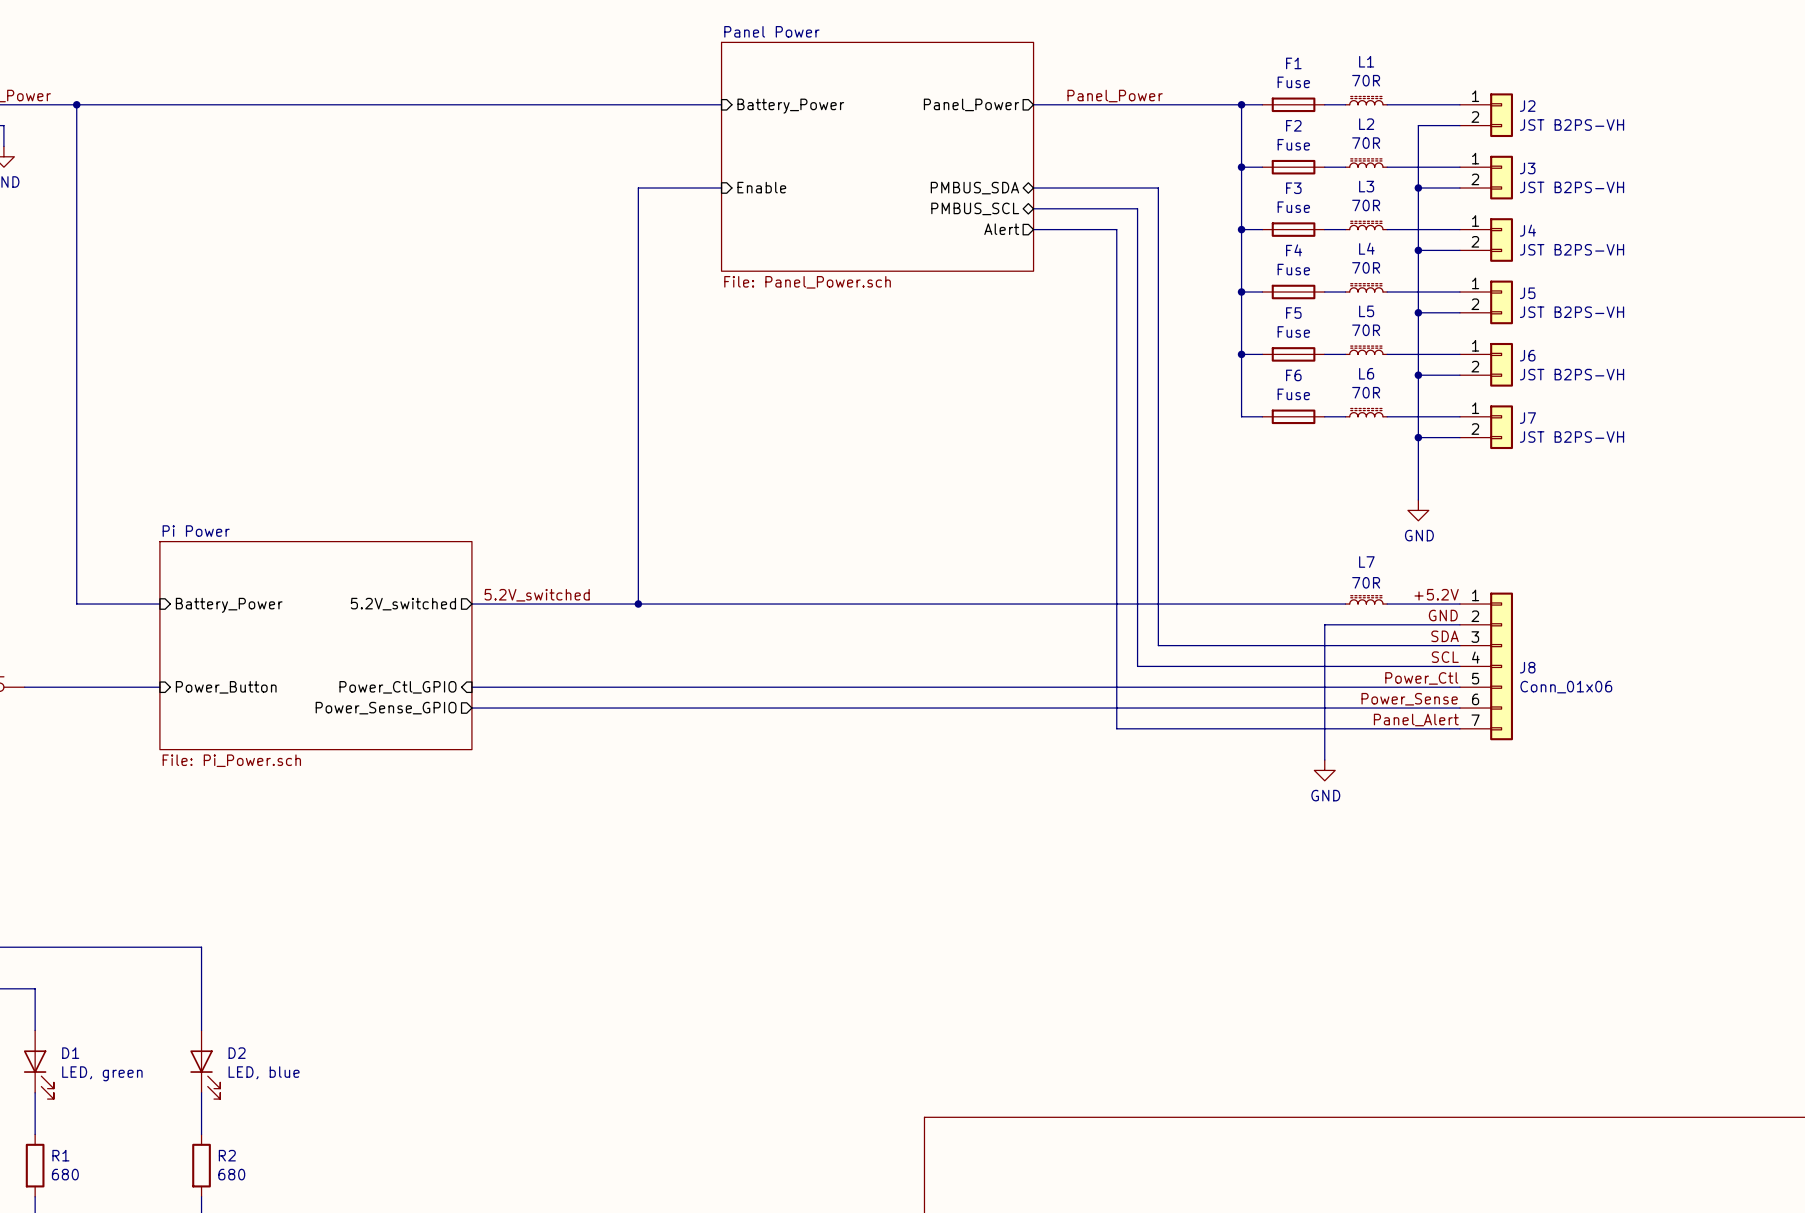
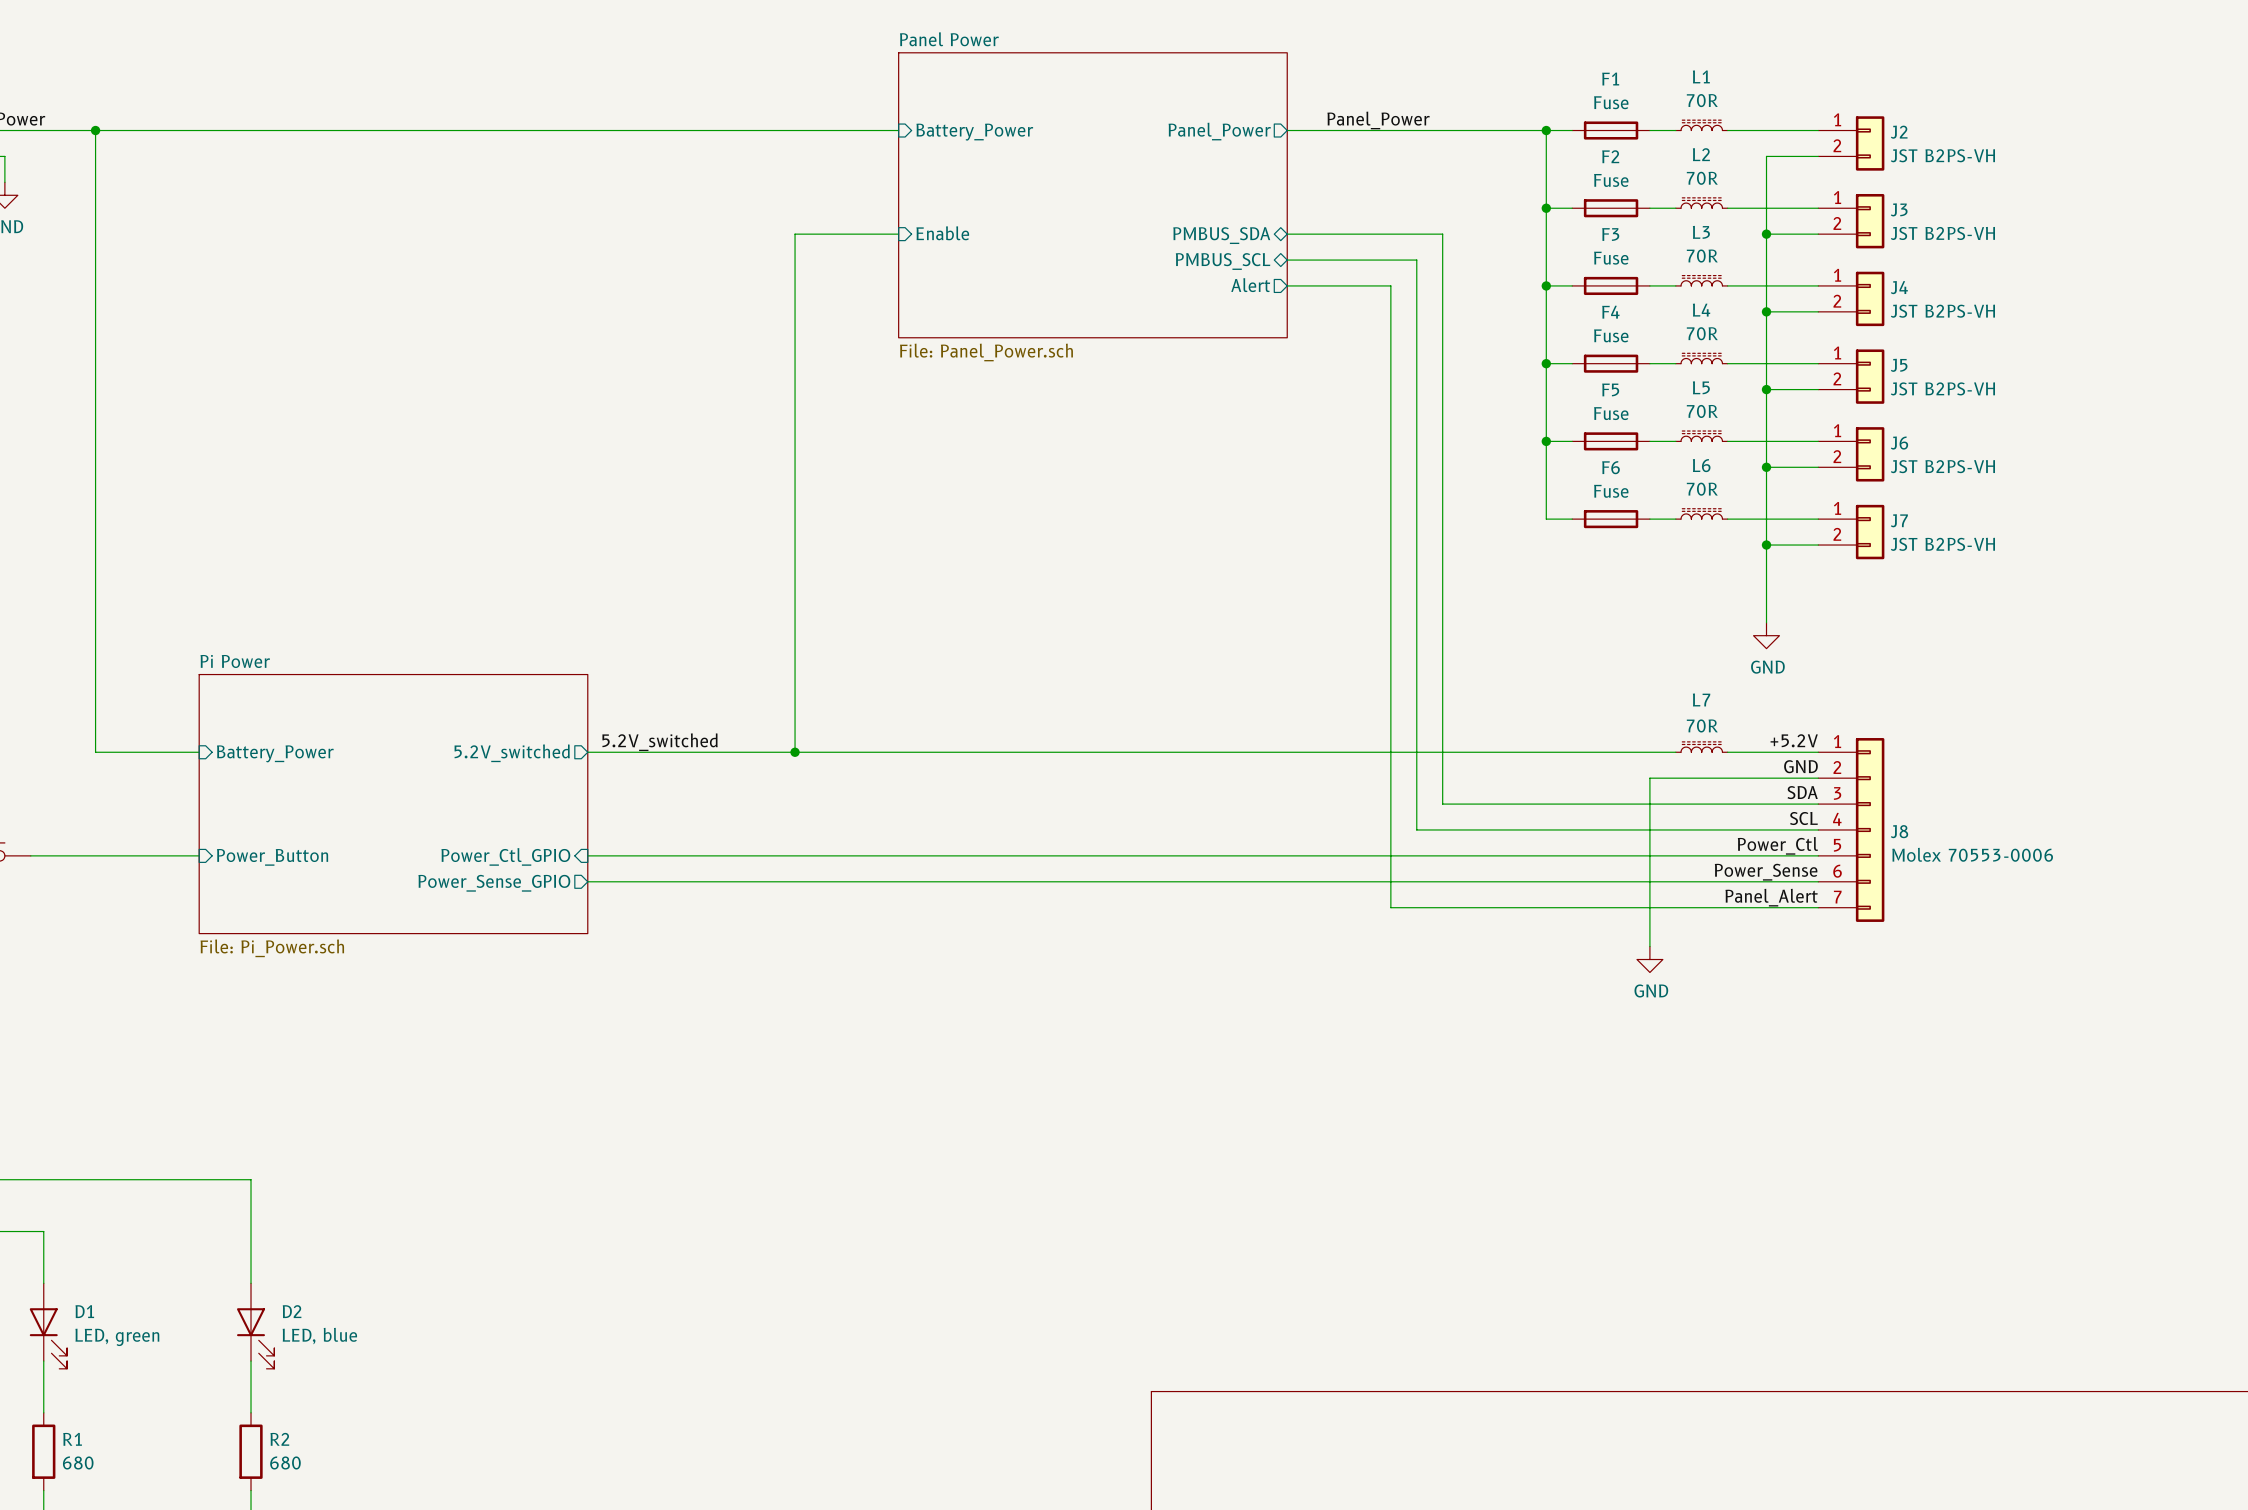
J8 value: Conn_01x06 (1566, 687) -> Molex 70553-0006 (1972, 854)

